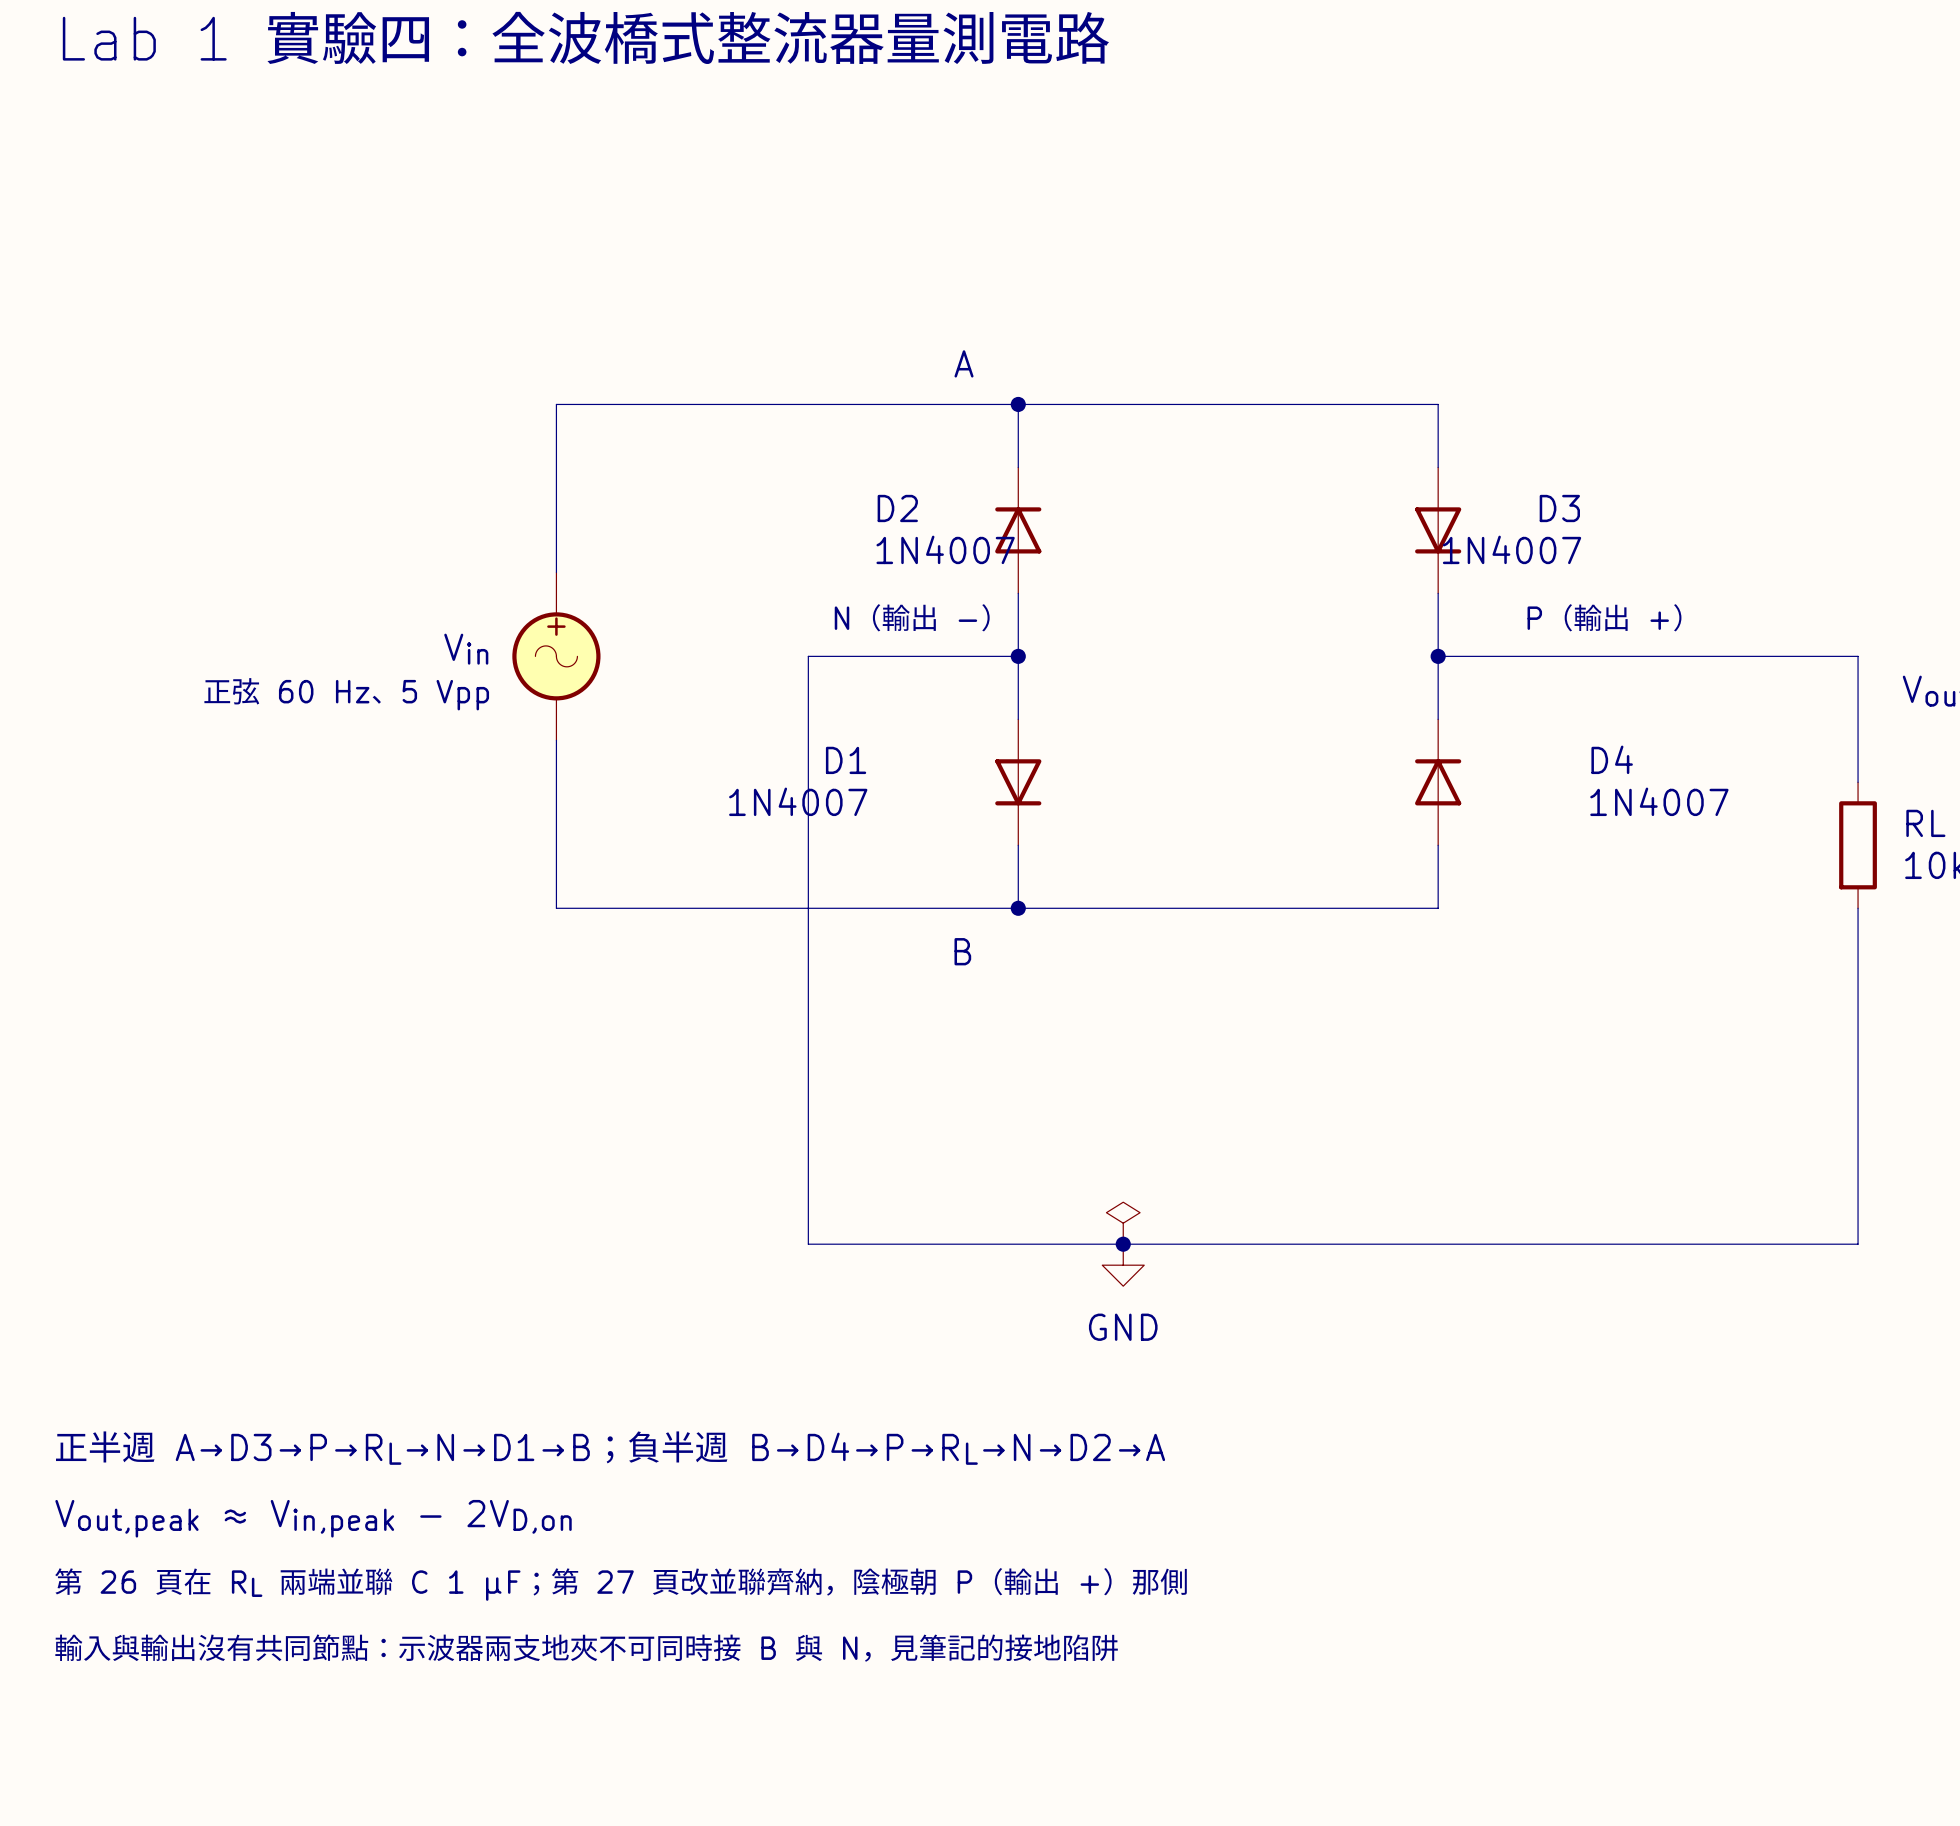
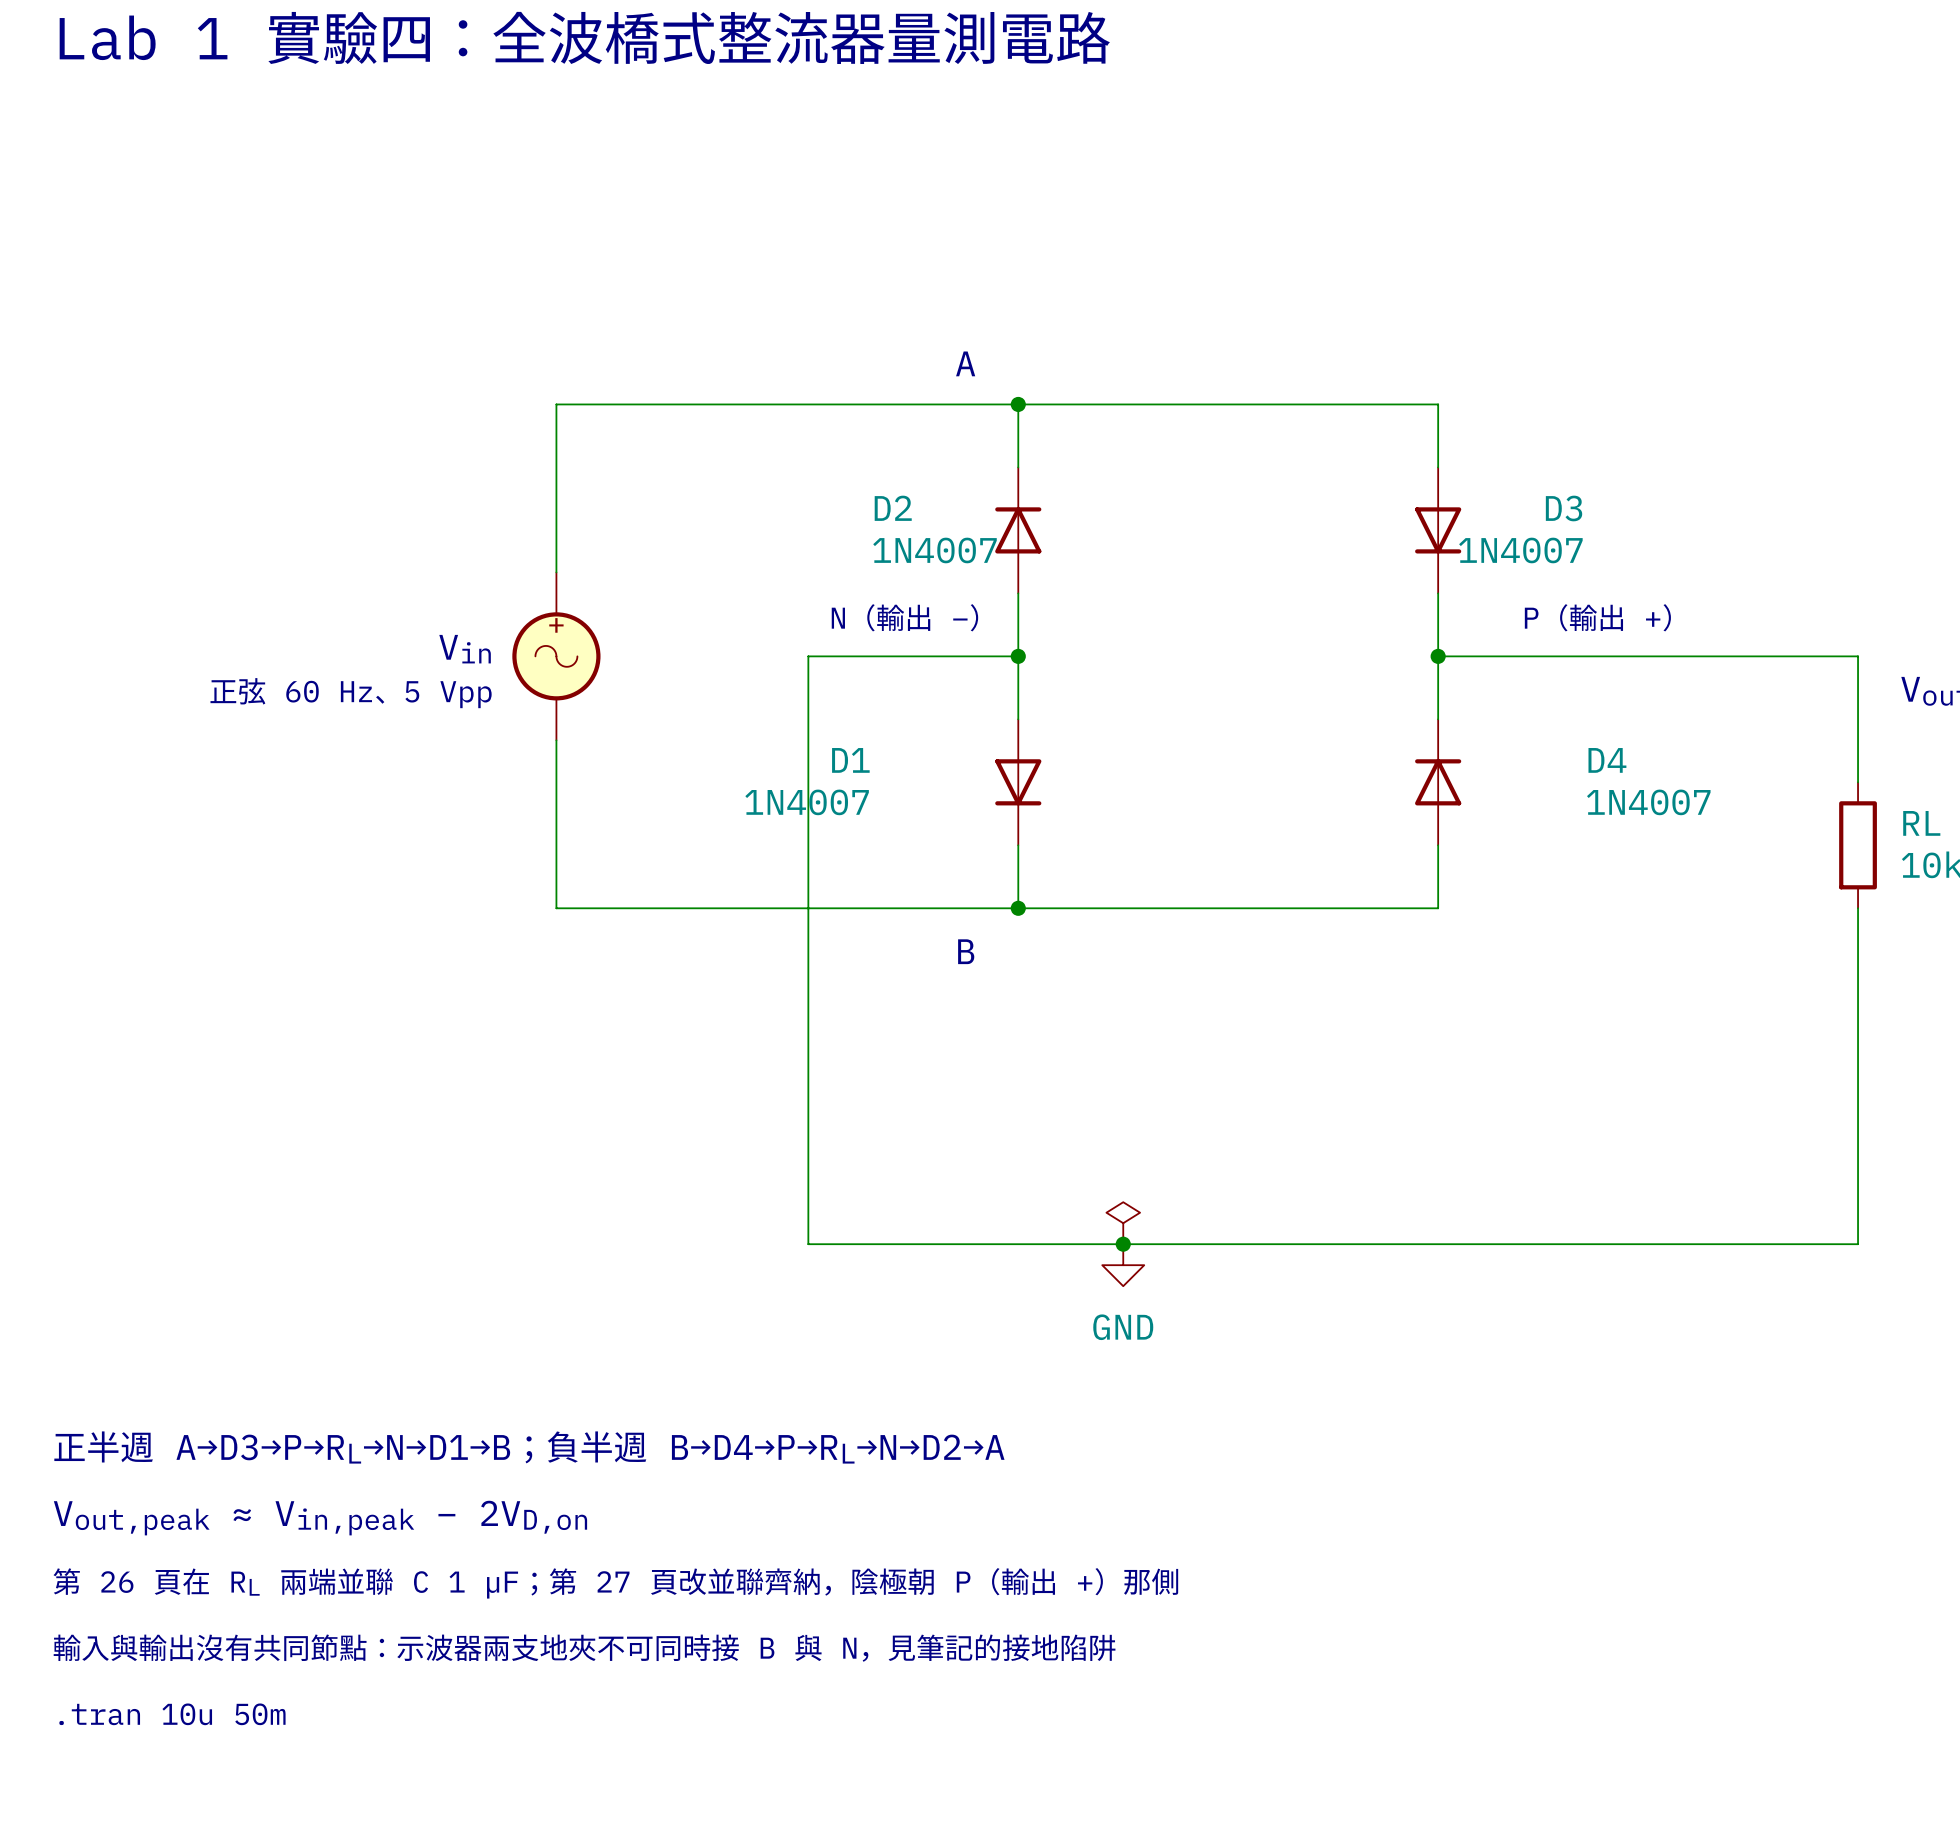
text: none -> .tran 10u 50m (172, 1714)

